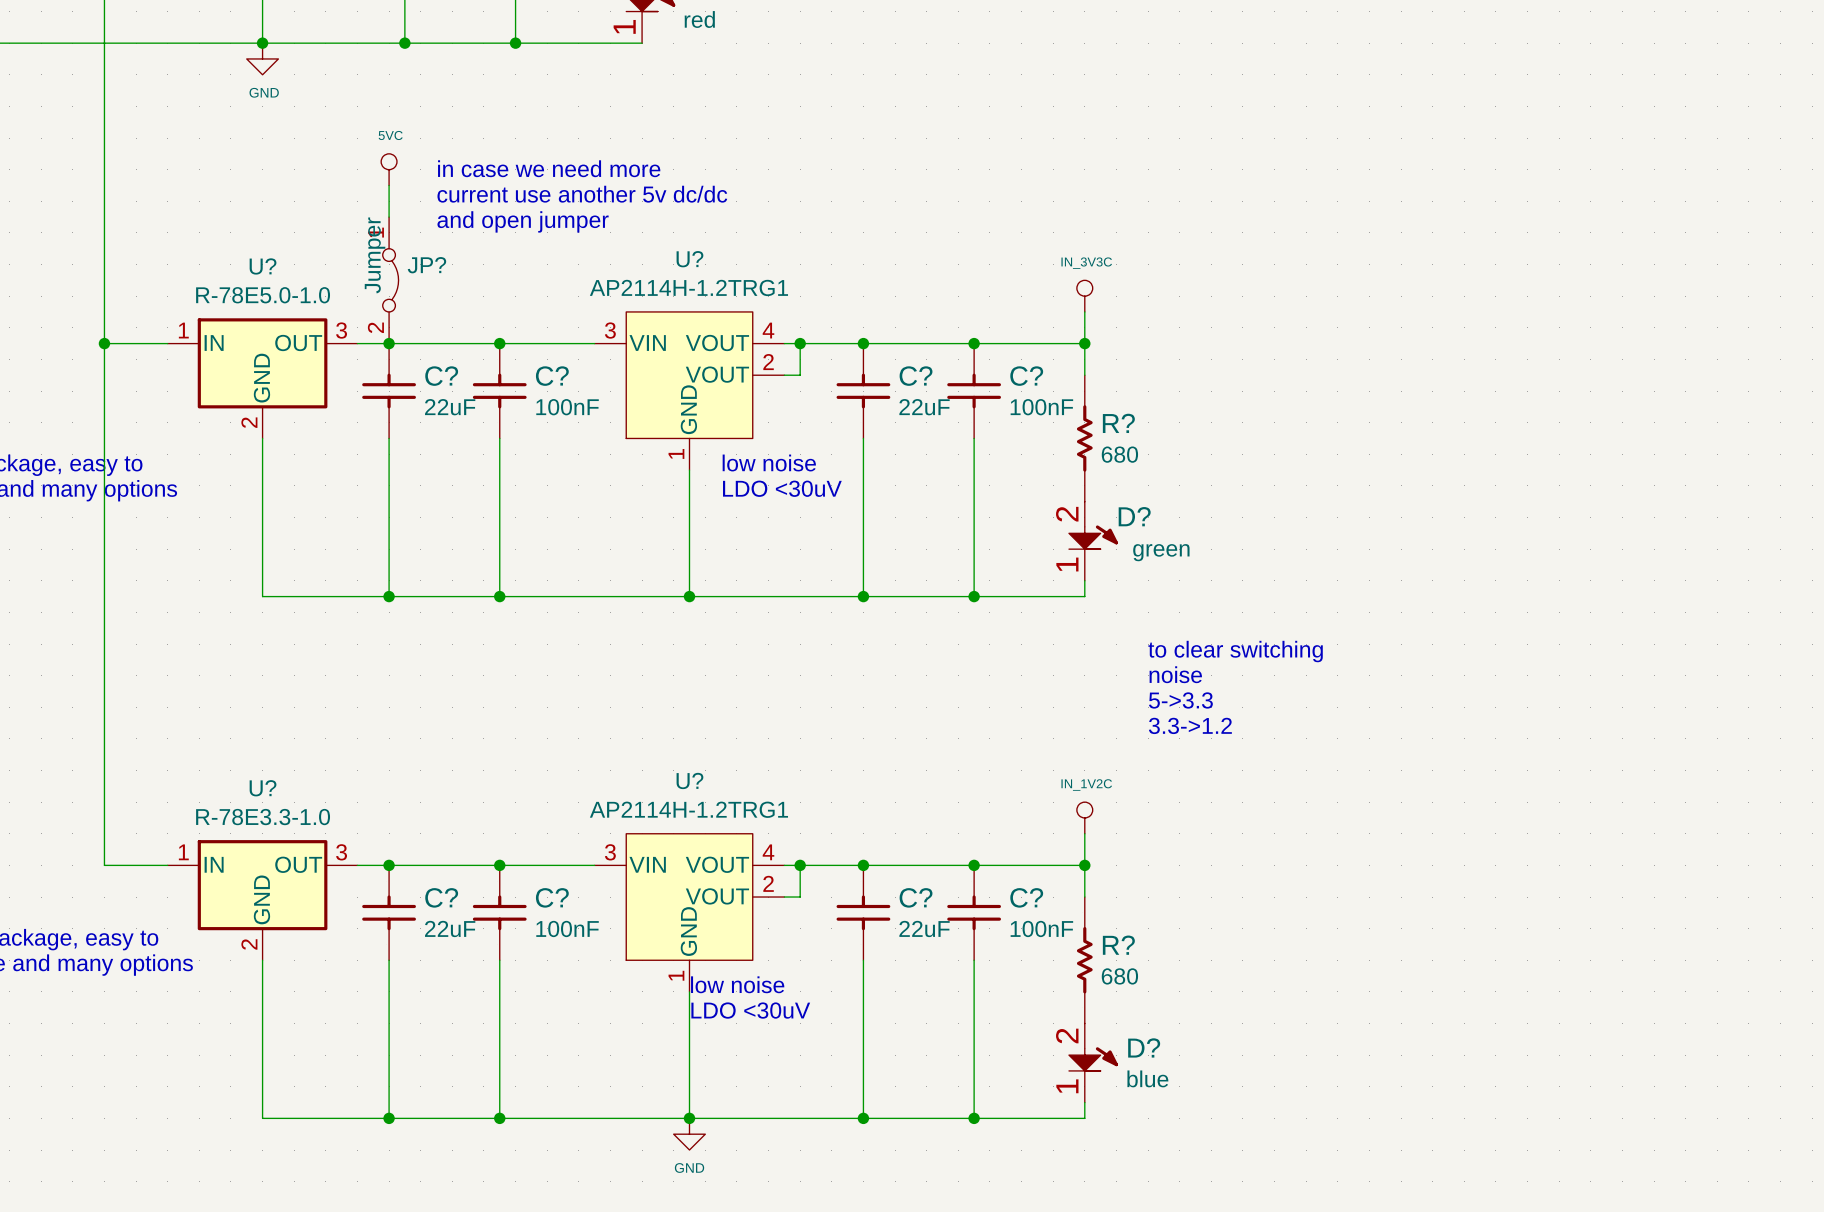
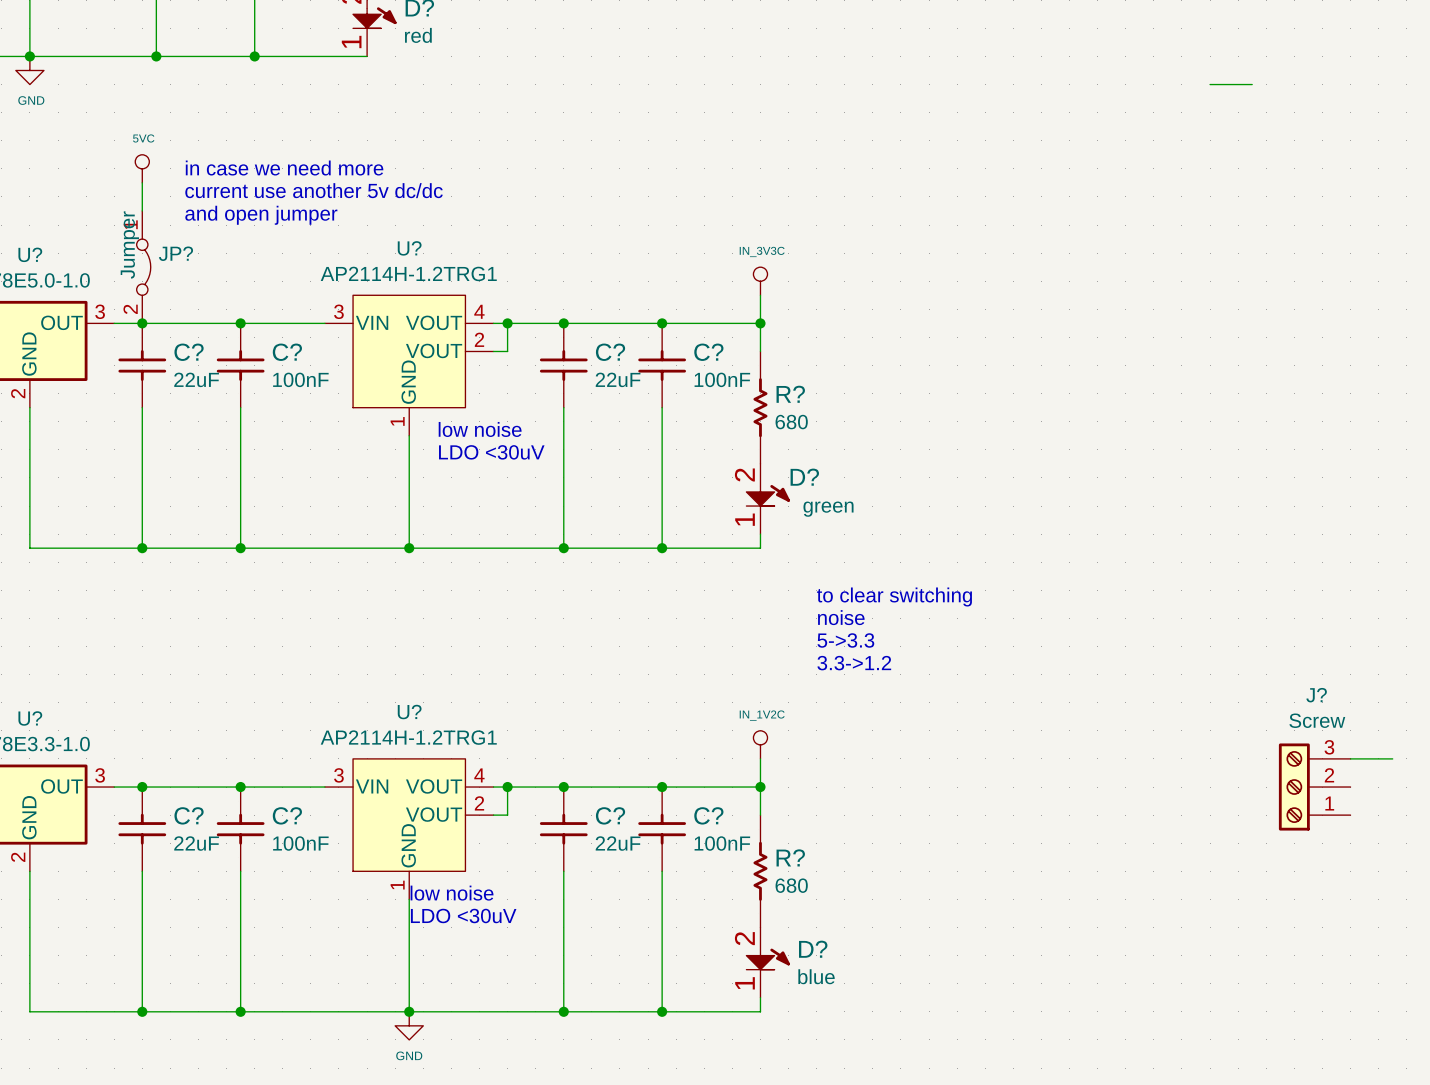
wire: none -> (1210, 84) (1252, 84)
wire: none -> (1350, 758) (1392, 758)
J?: none -> Screw (1314, 787)

